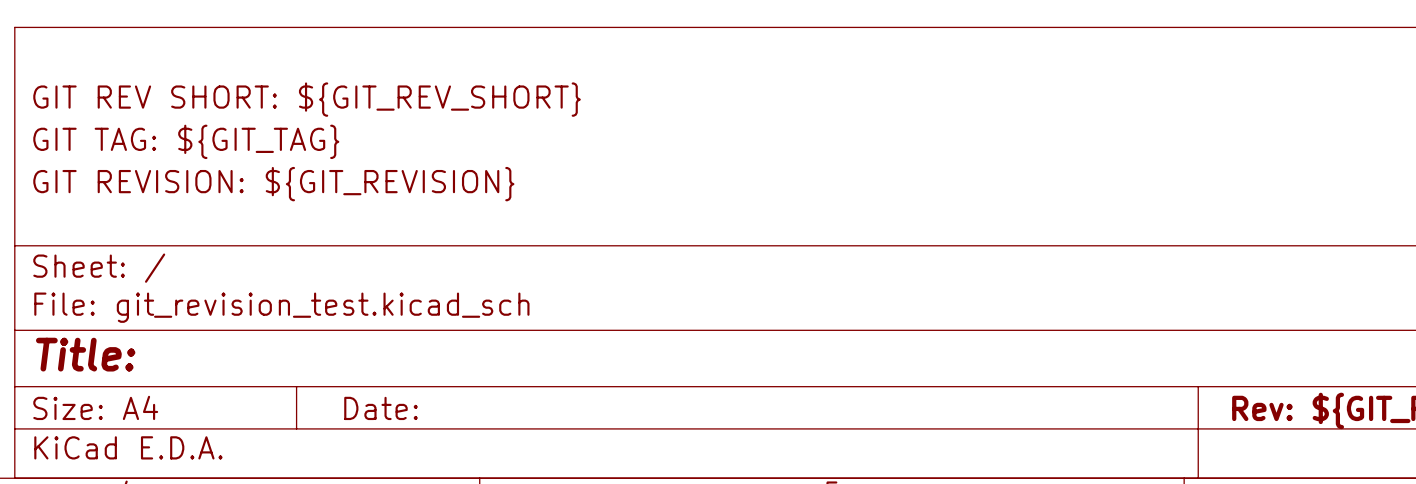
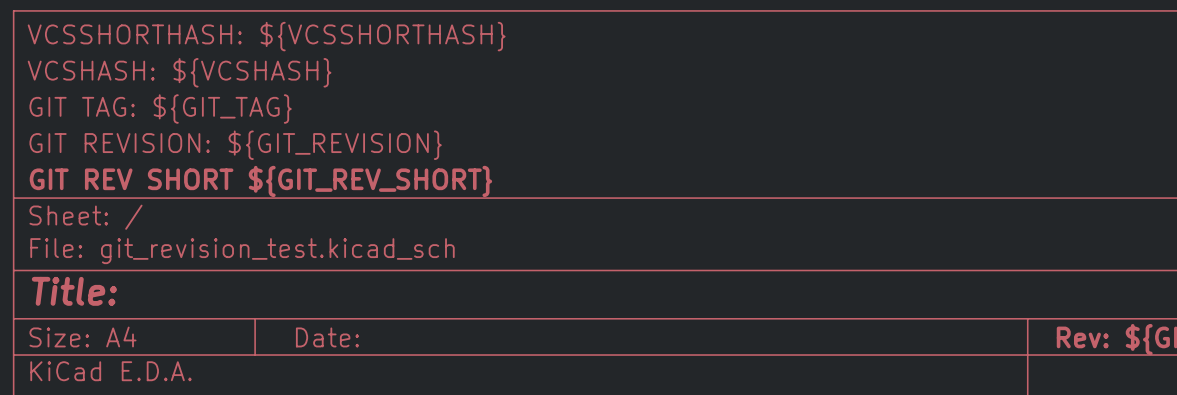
title block: none -> VCSSHORTHASH: ${VCSSHORTHASH} (266, 36)
title block: GIT REV SHORT: ${GIT_REV_SHORT} (307, 99) -> VCSHASH: ${VCSHASH} (179, 72)
title block: none -> GIT REV SHORT ${GIT_REV_SHORT} (260, 181)

